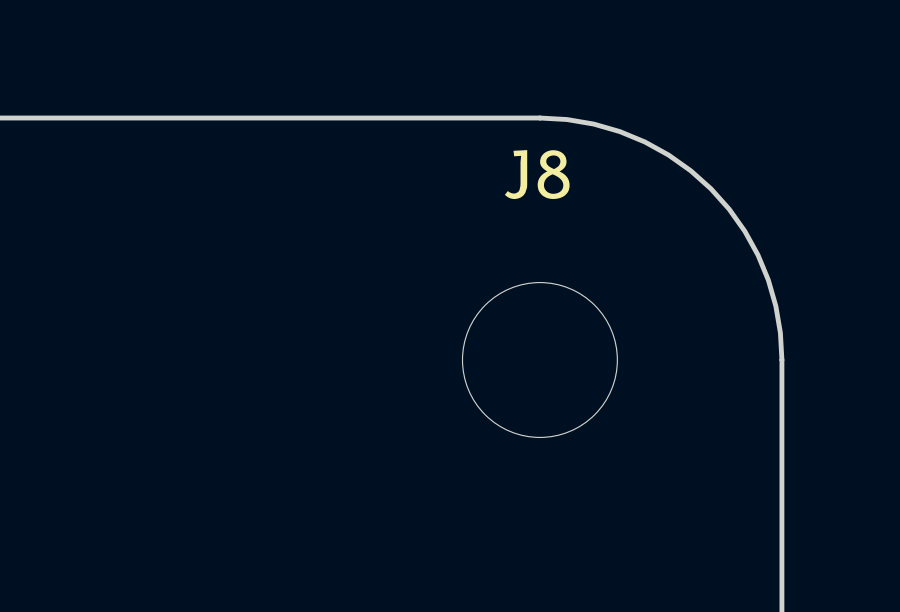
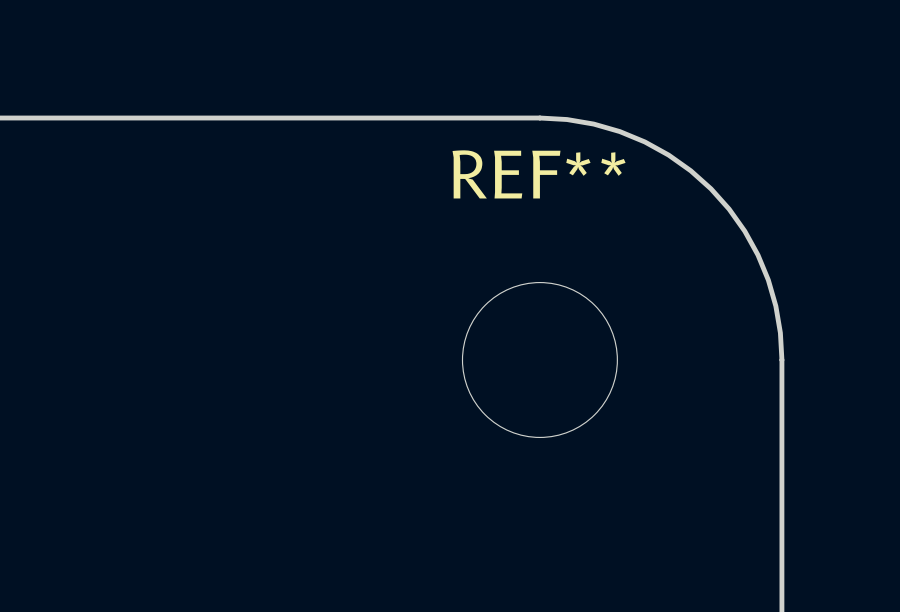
J8 name: J8 (537, 174) -> REF** (539, 174)

